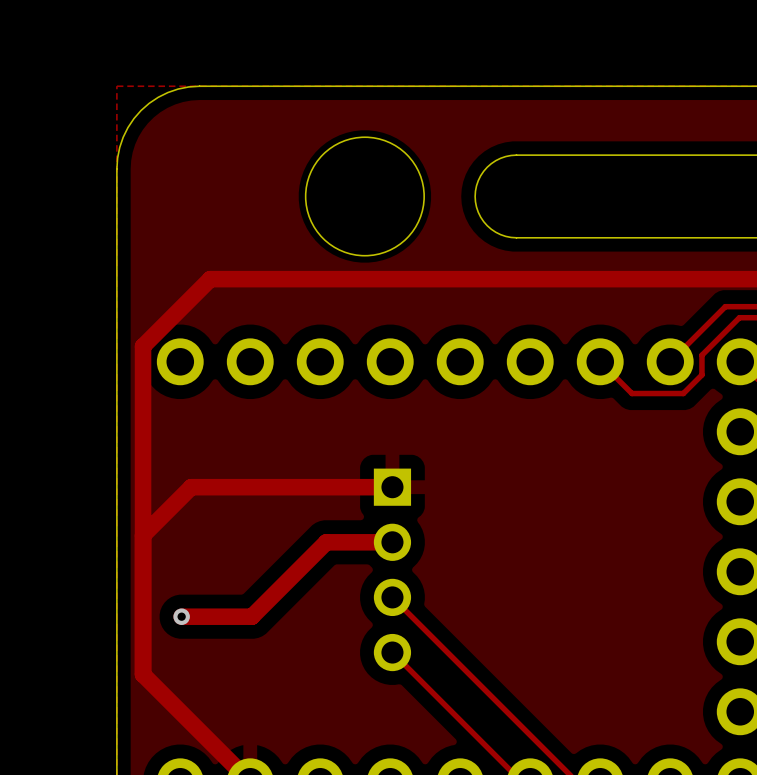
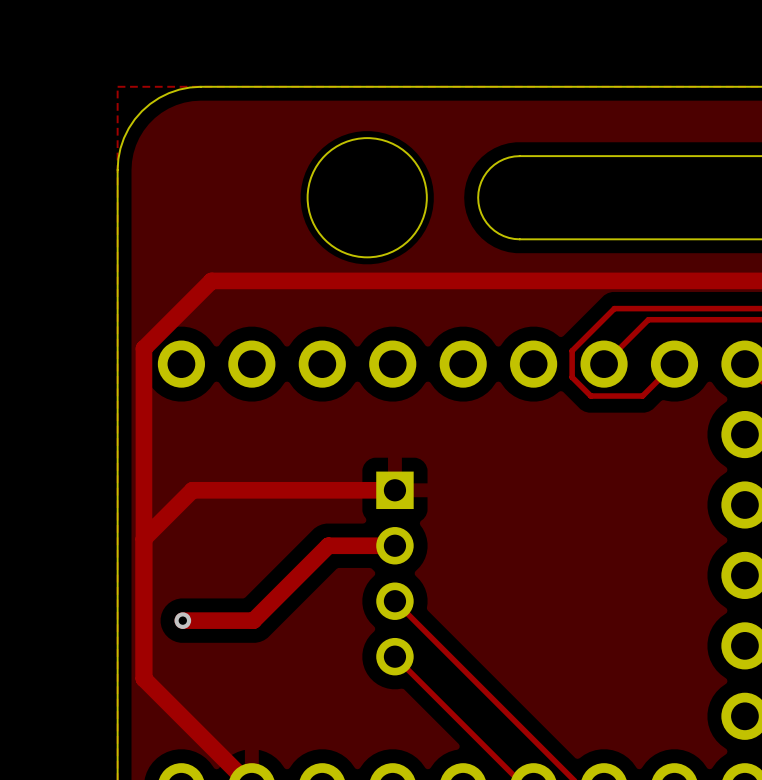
track: (725, 306) (670, 361) -> (729, 308) (614, 308) (572, 350) (572, 377) (590, 396) (635, 396)
track: (739, 317) (701, 355) (701, 374) (683, 393) (638, 393) -> (744, 319) (648, 319) (604, 364)
track: (600, 361) (631, 393) -> none
track: none -> (674, 364) (642, 396)

